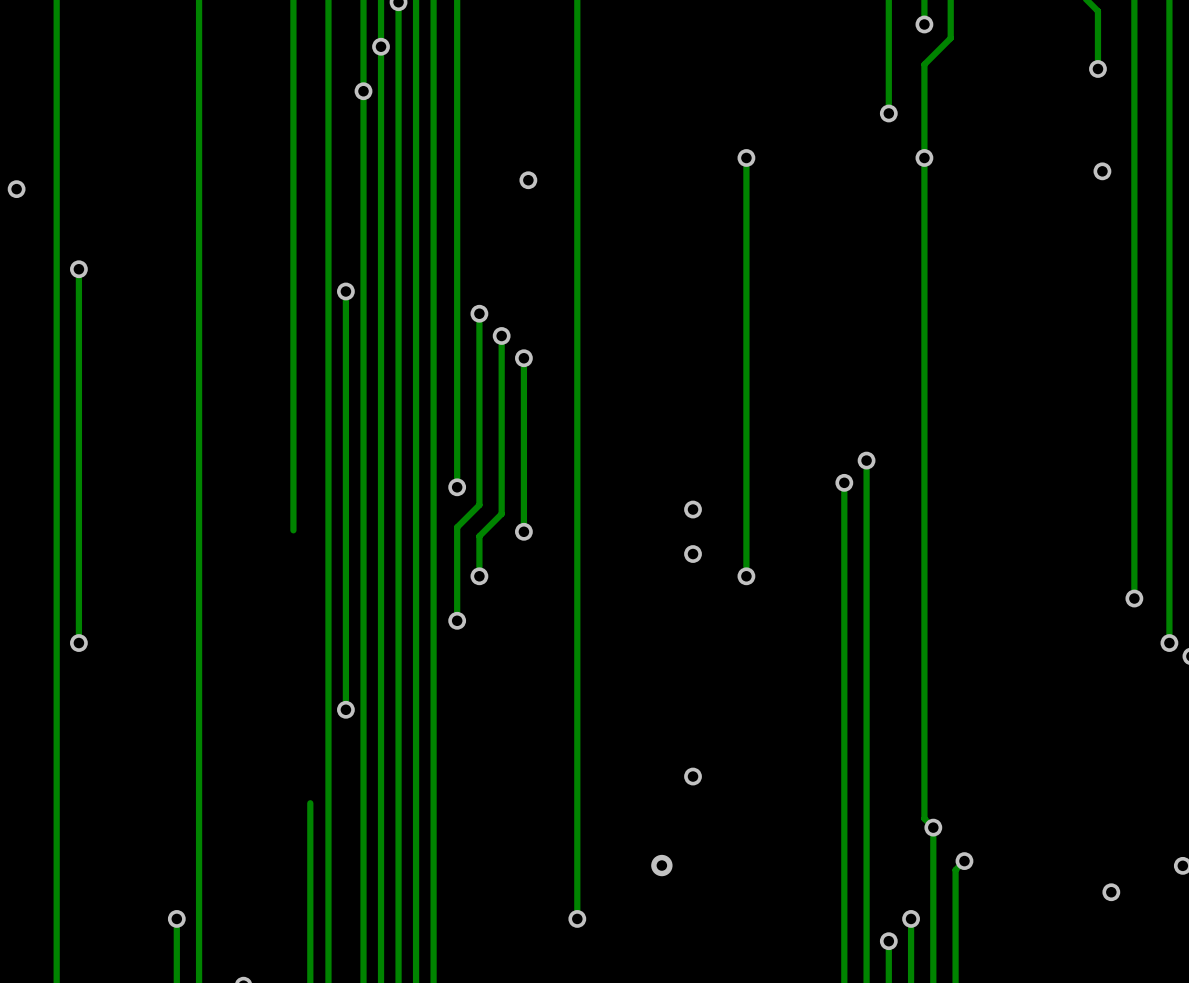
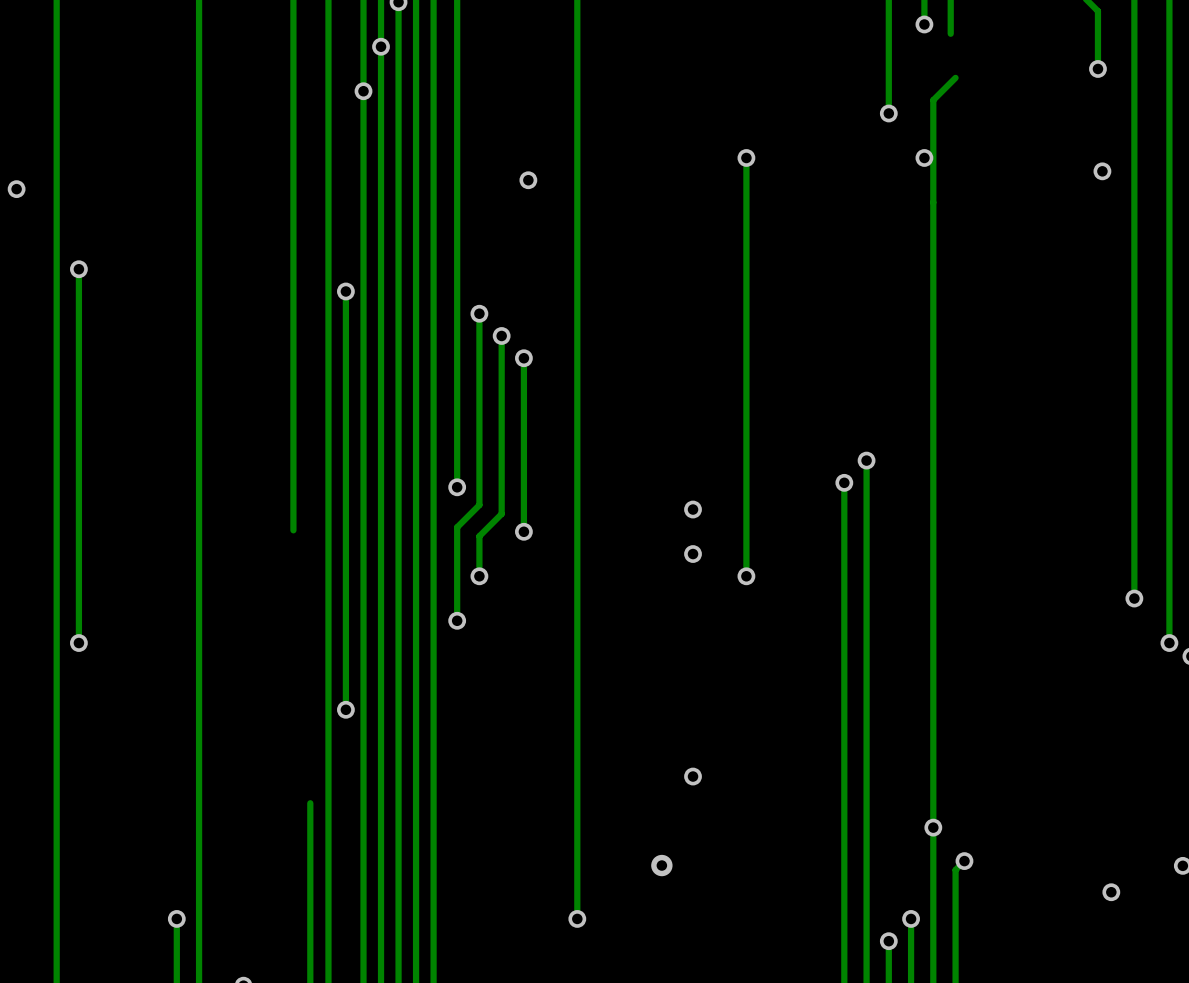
track: (950, 33) (950, 38) (924, 64) (924, 818) (933, 827) -> (955, 77) (933, 100) (933, 827)

